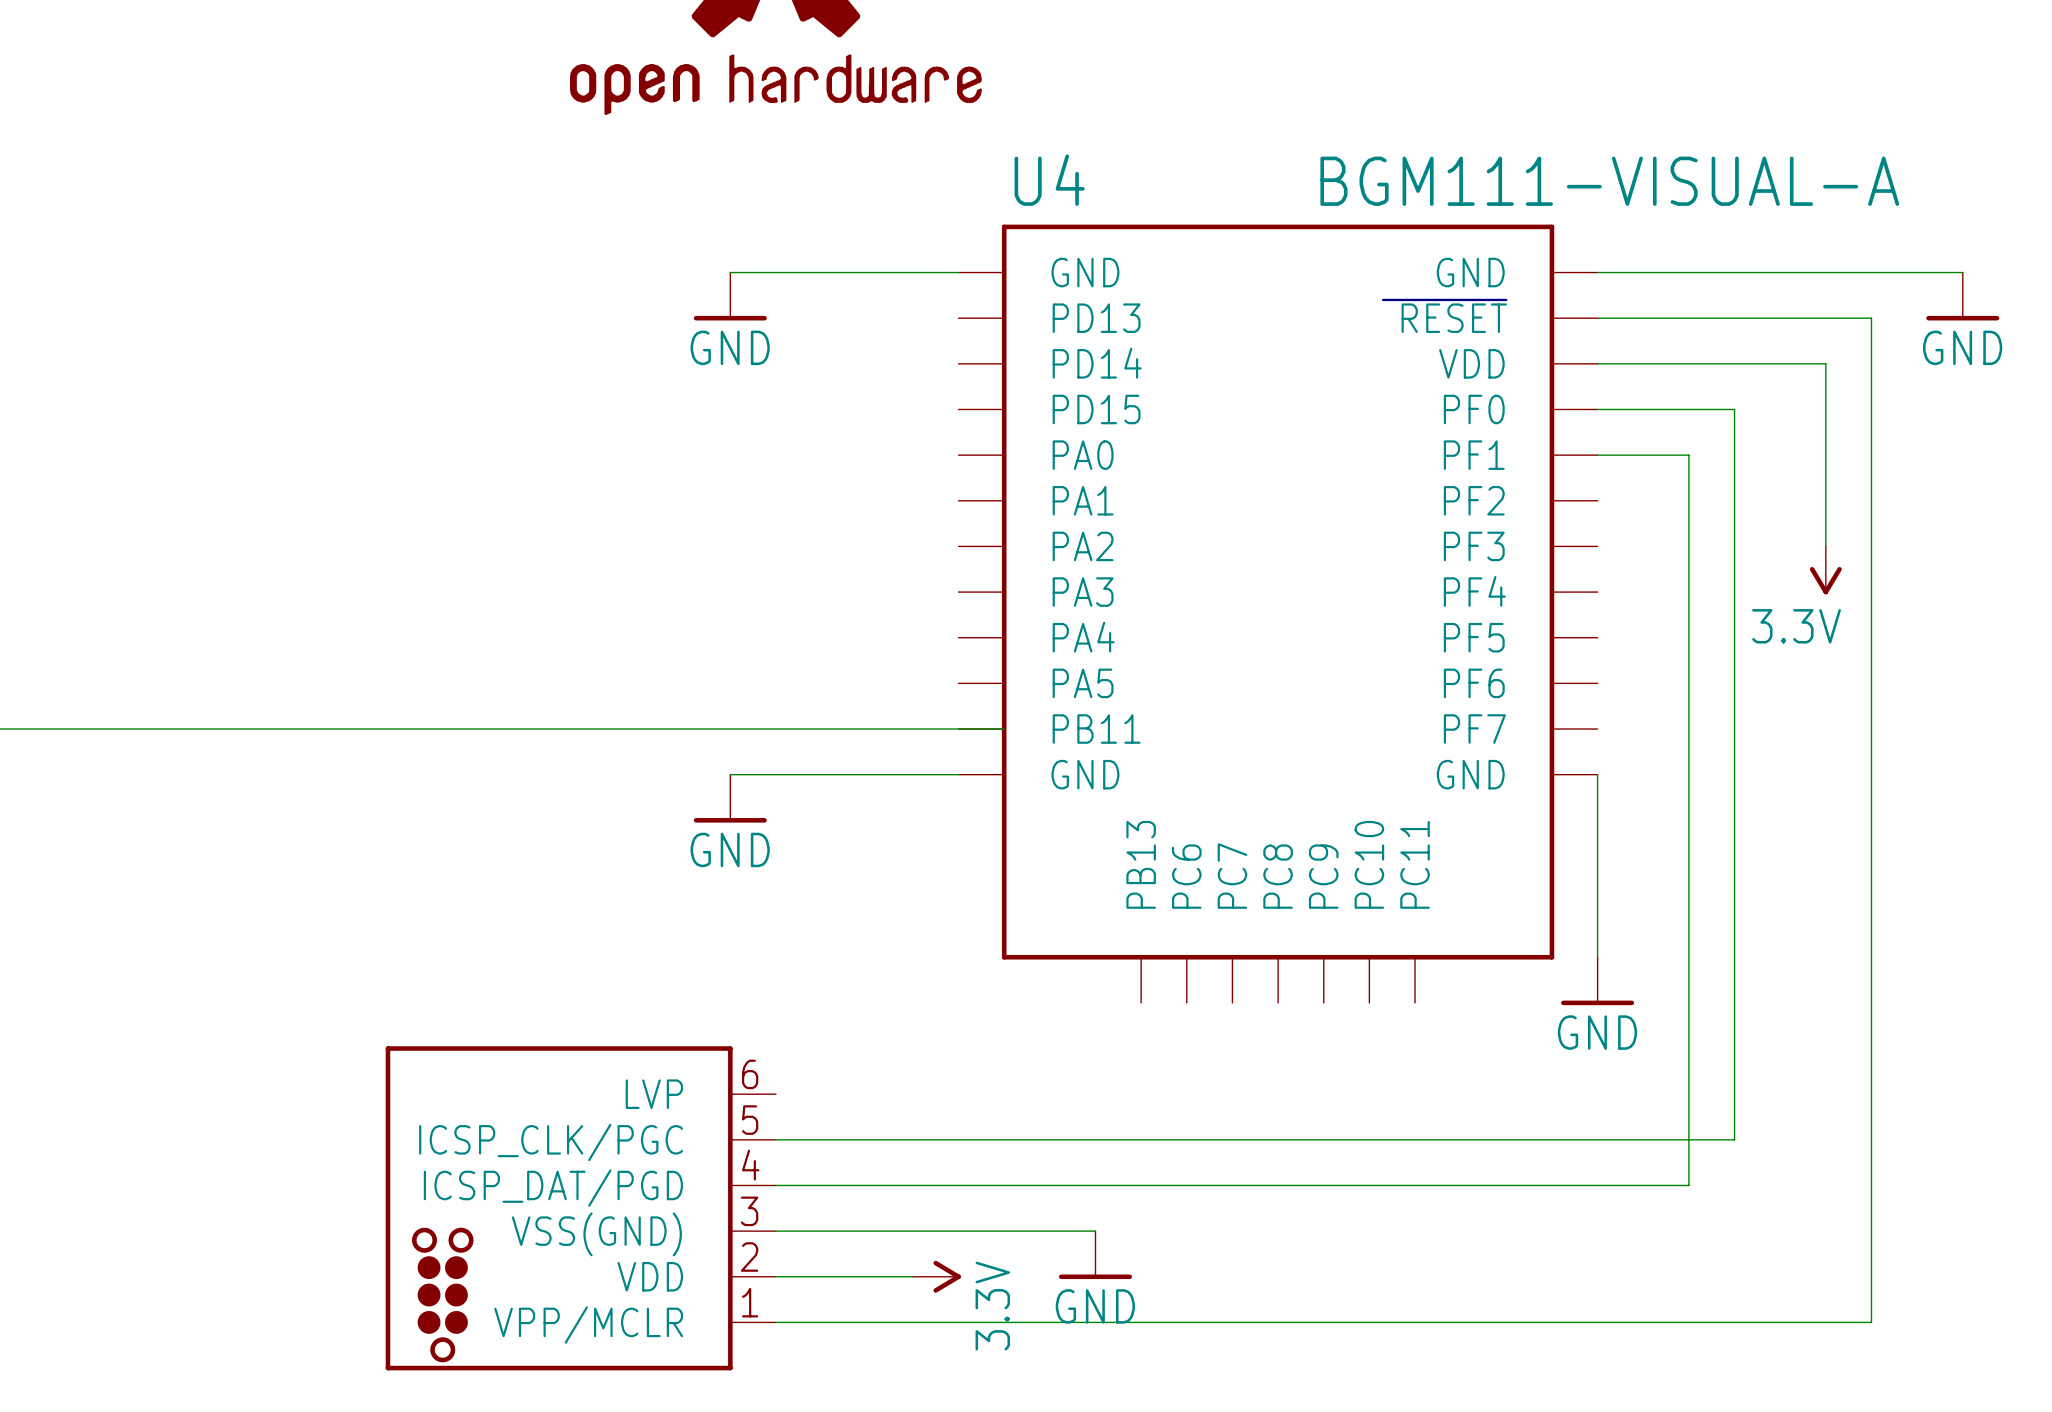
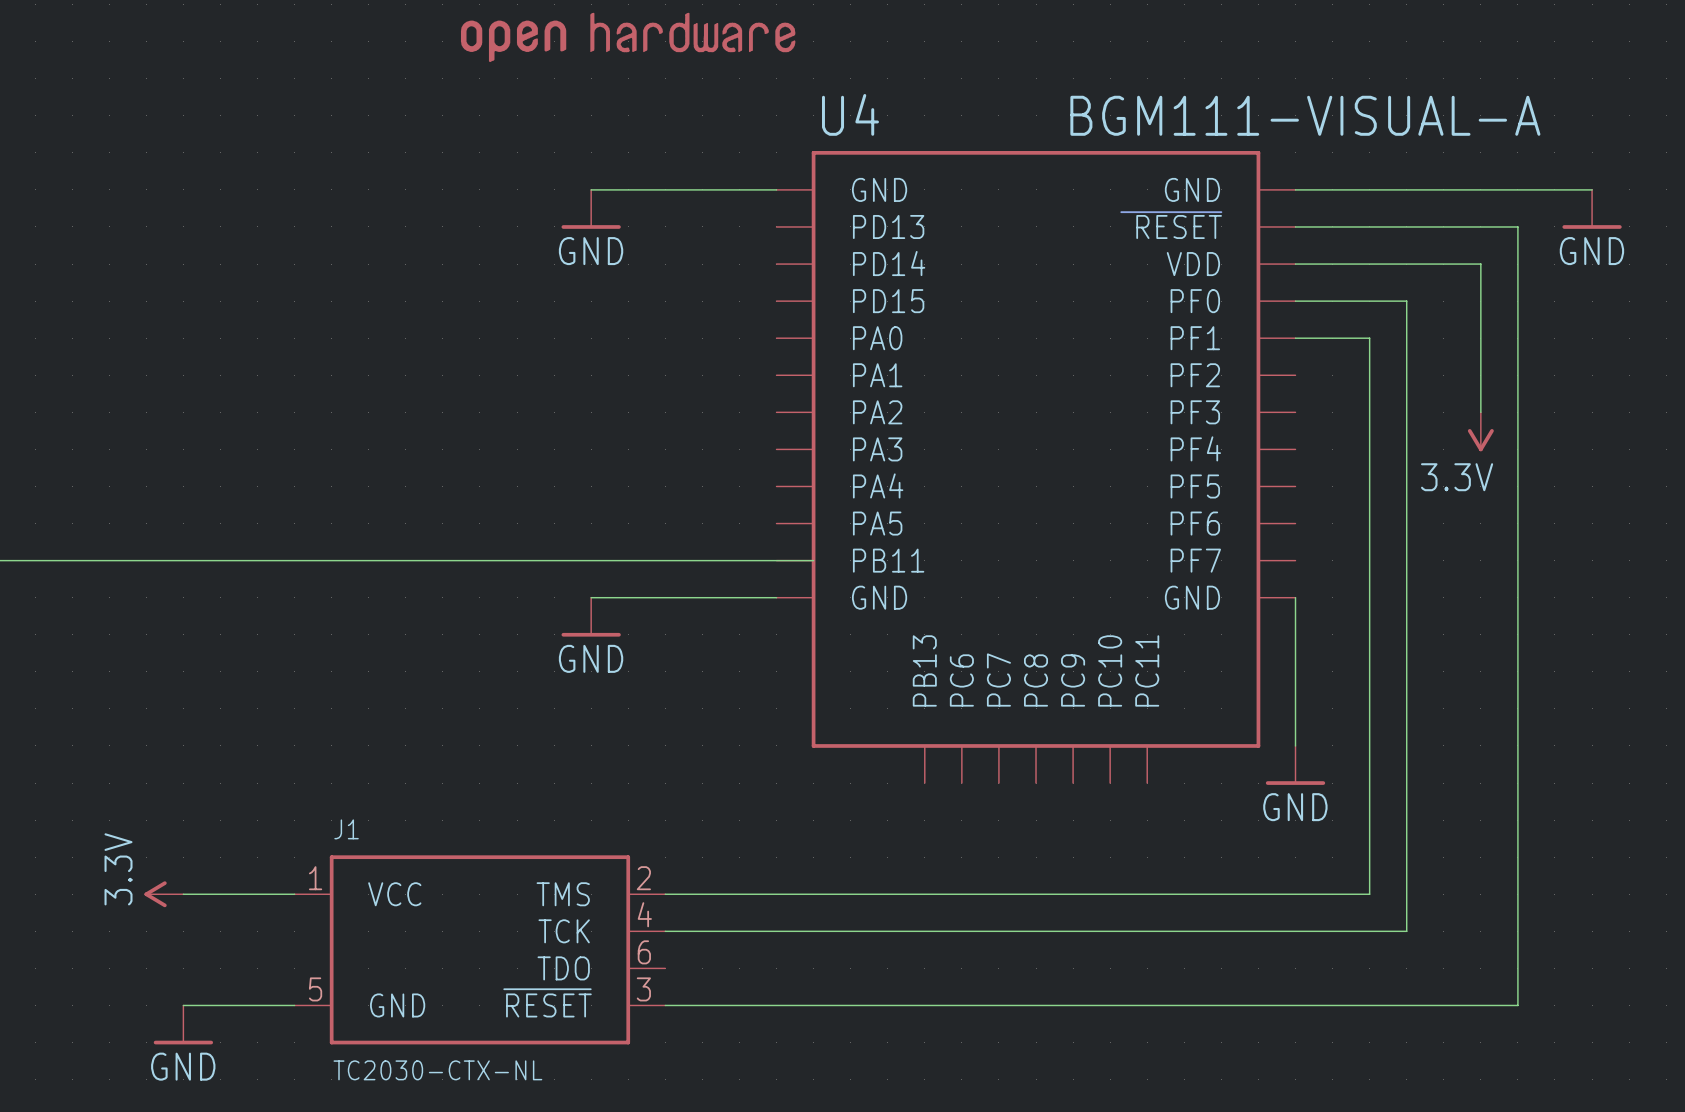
power symbol: none -> 3.3V (163, 894)
wire: none -> (183, 894) (294, 894)
wire: (1734, 1139) (1688, 1139) (1688, 1185) -> (1406, 894) (1406, 931) (1369, 931)
part: (580, 1208) -> none
J1: none -> TC2030-CTX-NL (479, 949)
wire: (775, 1231) (1095, 1231) -> none
power symbol: GND (1095, 1255) -> none
wire: none -> (183, 1005) (294, 1005)
power symbol: 3.3V (936, 1276) -> none
wire: (1871, 1276) (1871, 1322) (775, 1322) -> (1517, 1005) (739, 1005)
power symbol: none -> GND (183, 1024)

